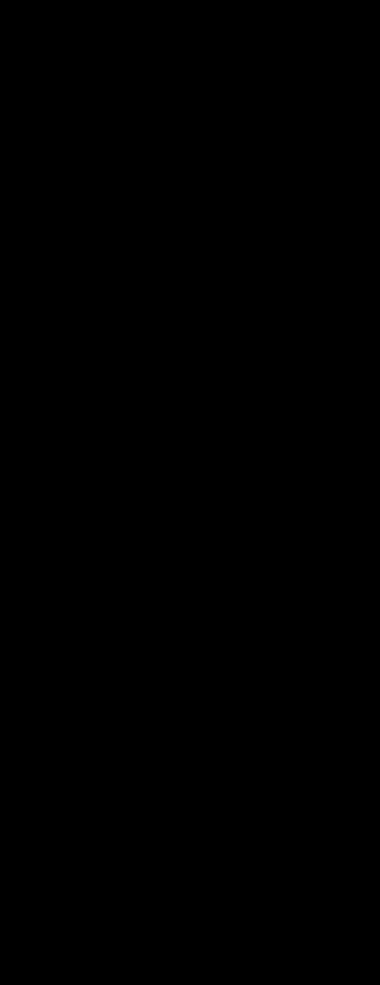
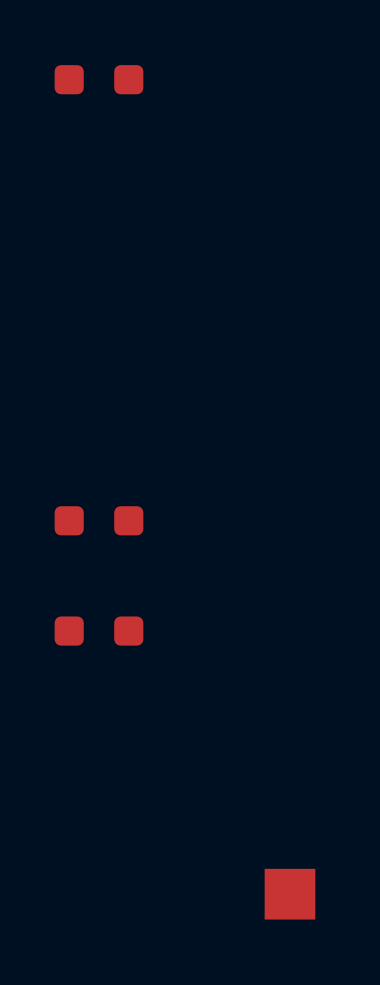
part: none -> (98, 79)
part: none -> (98, 520)
part: none -> (98, 631)
part: none -> (289, 894)

